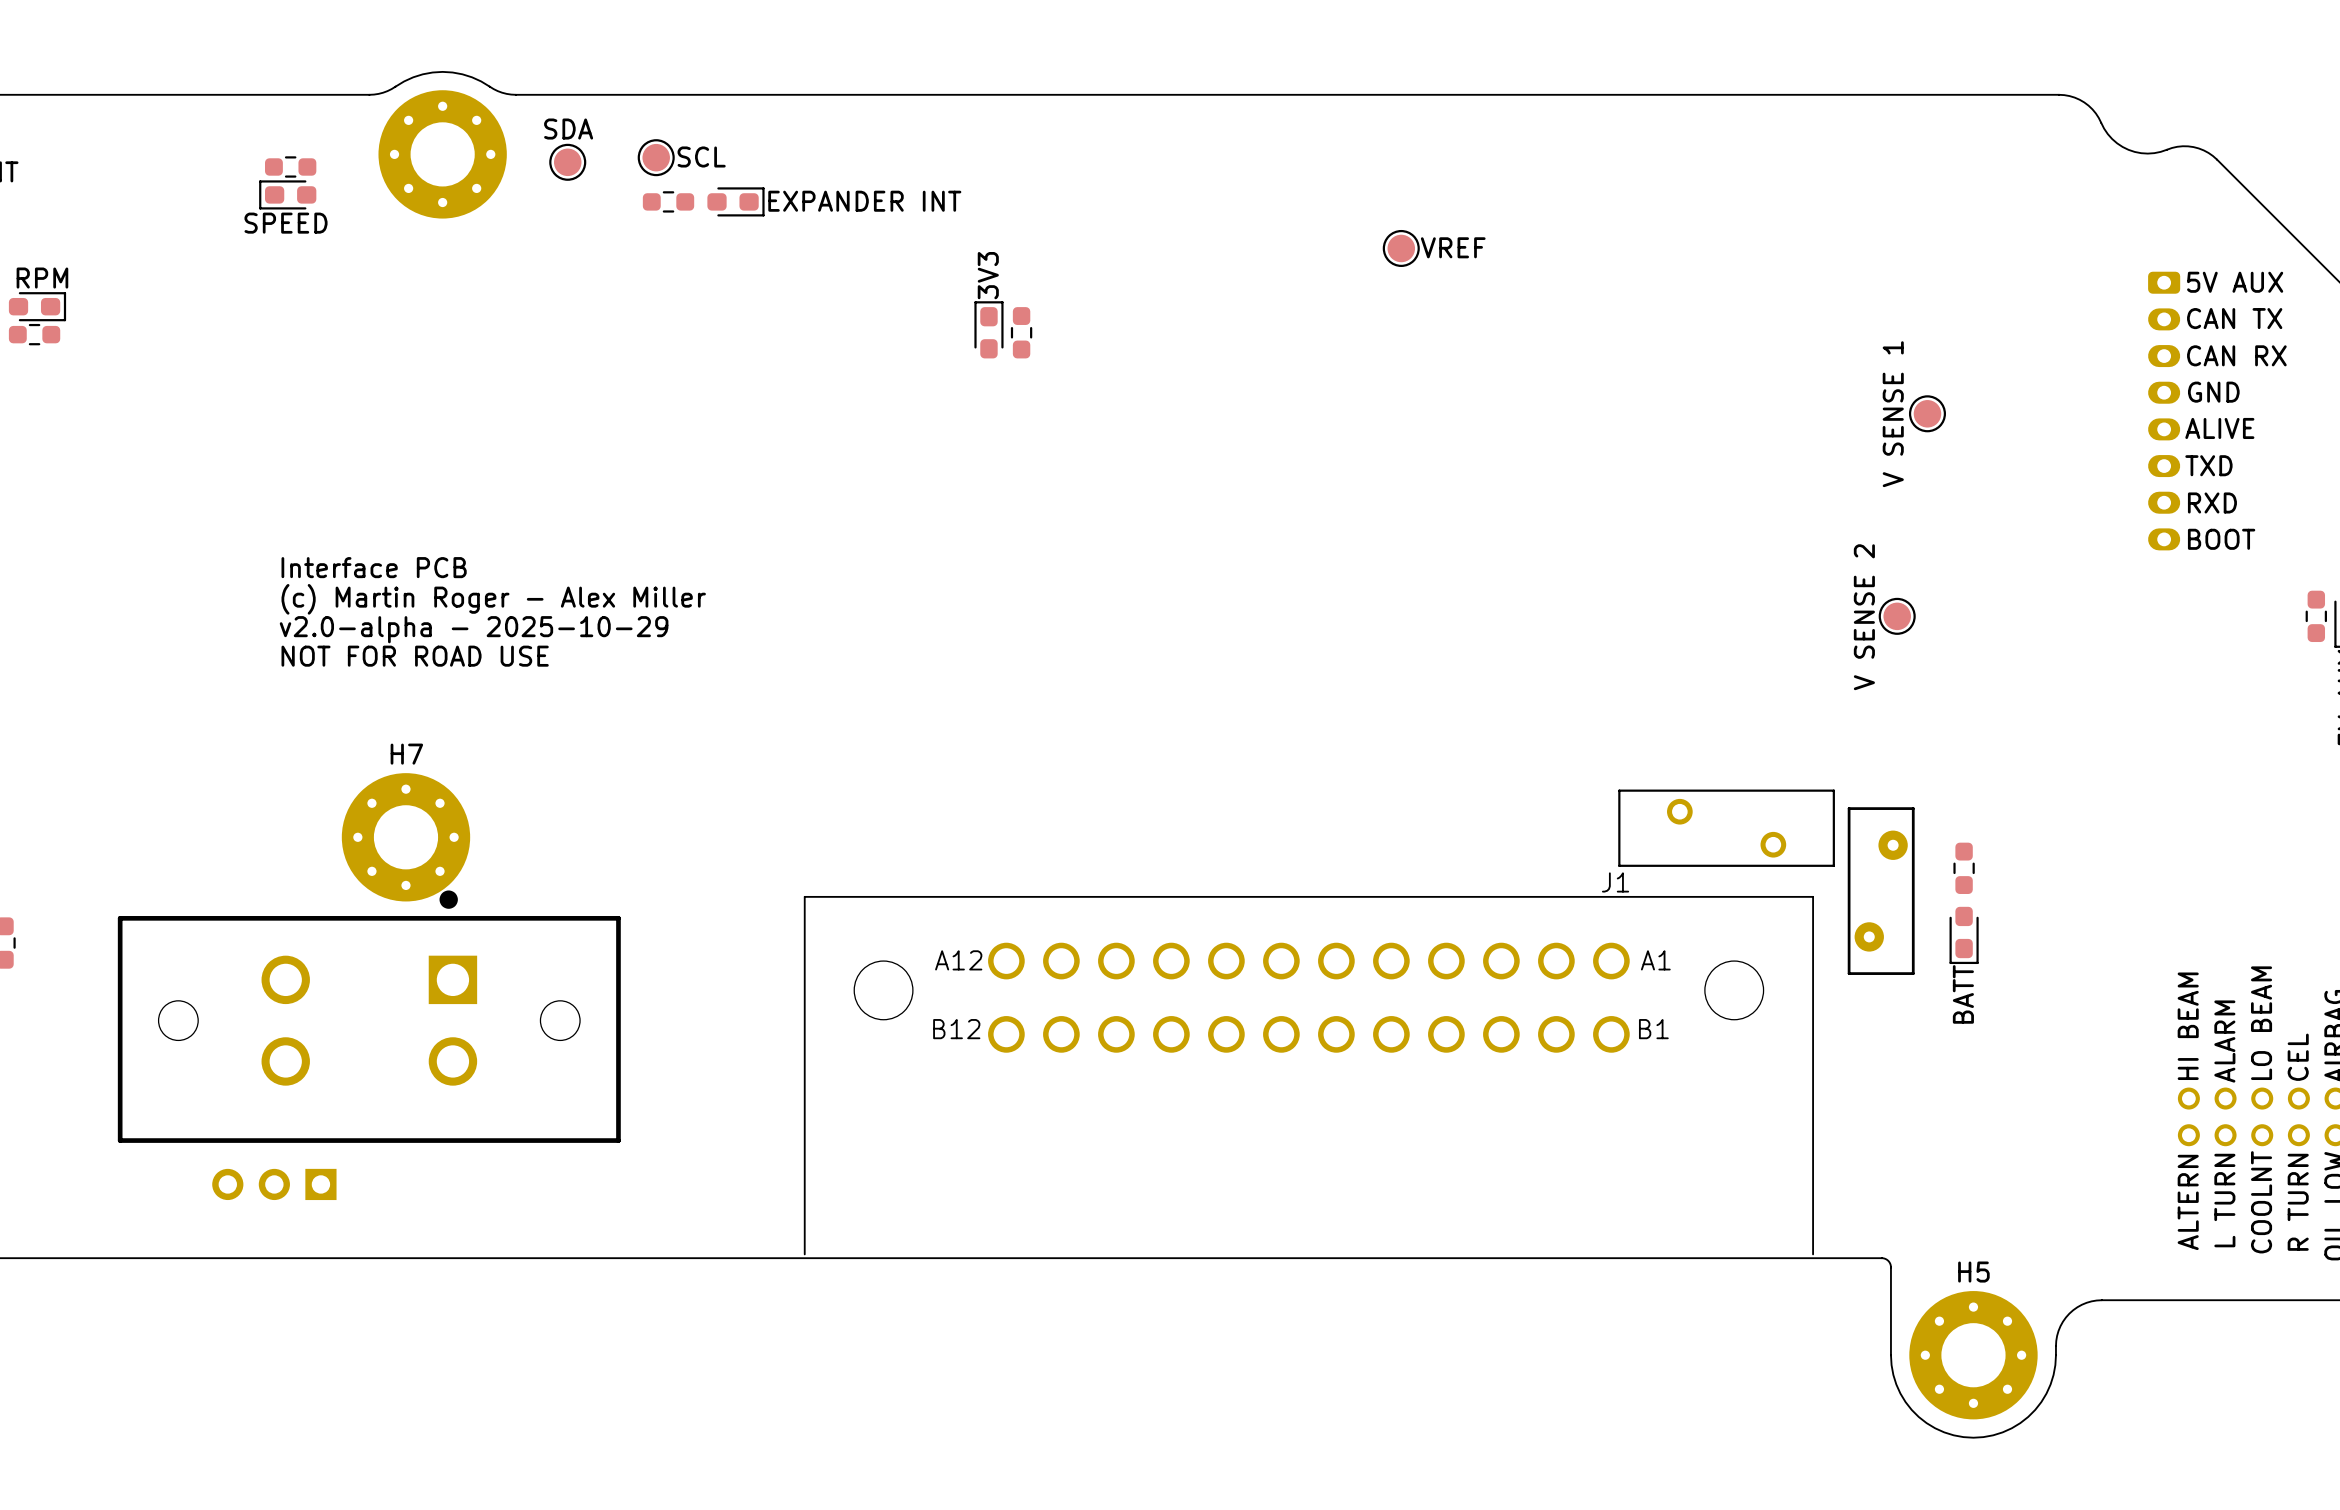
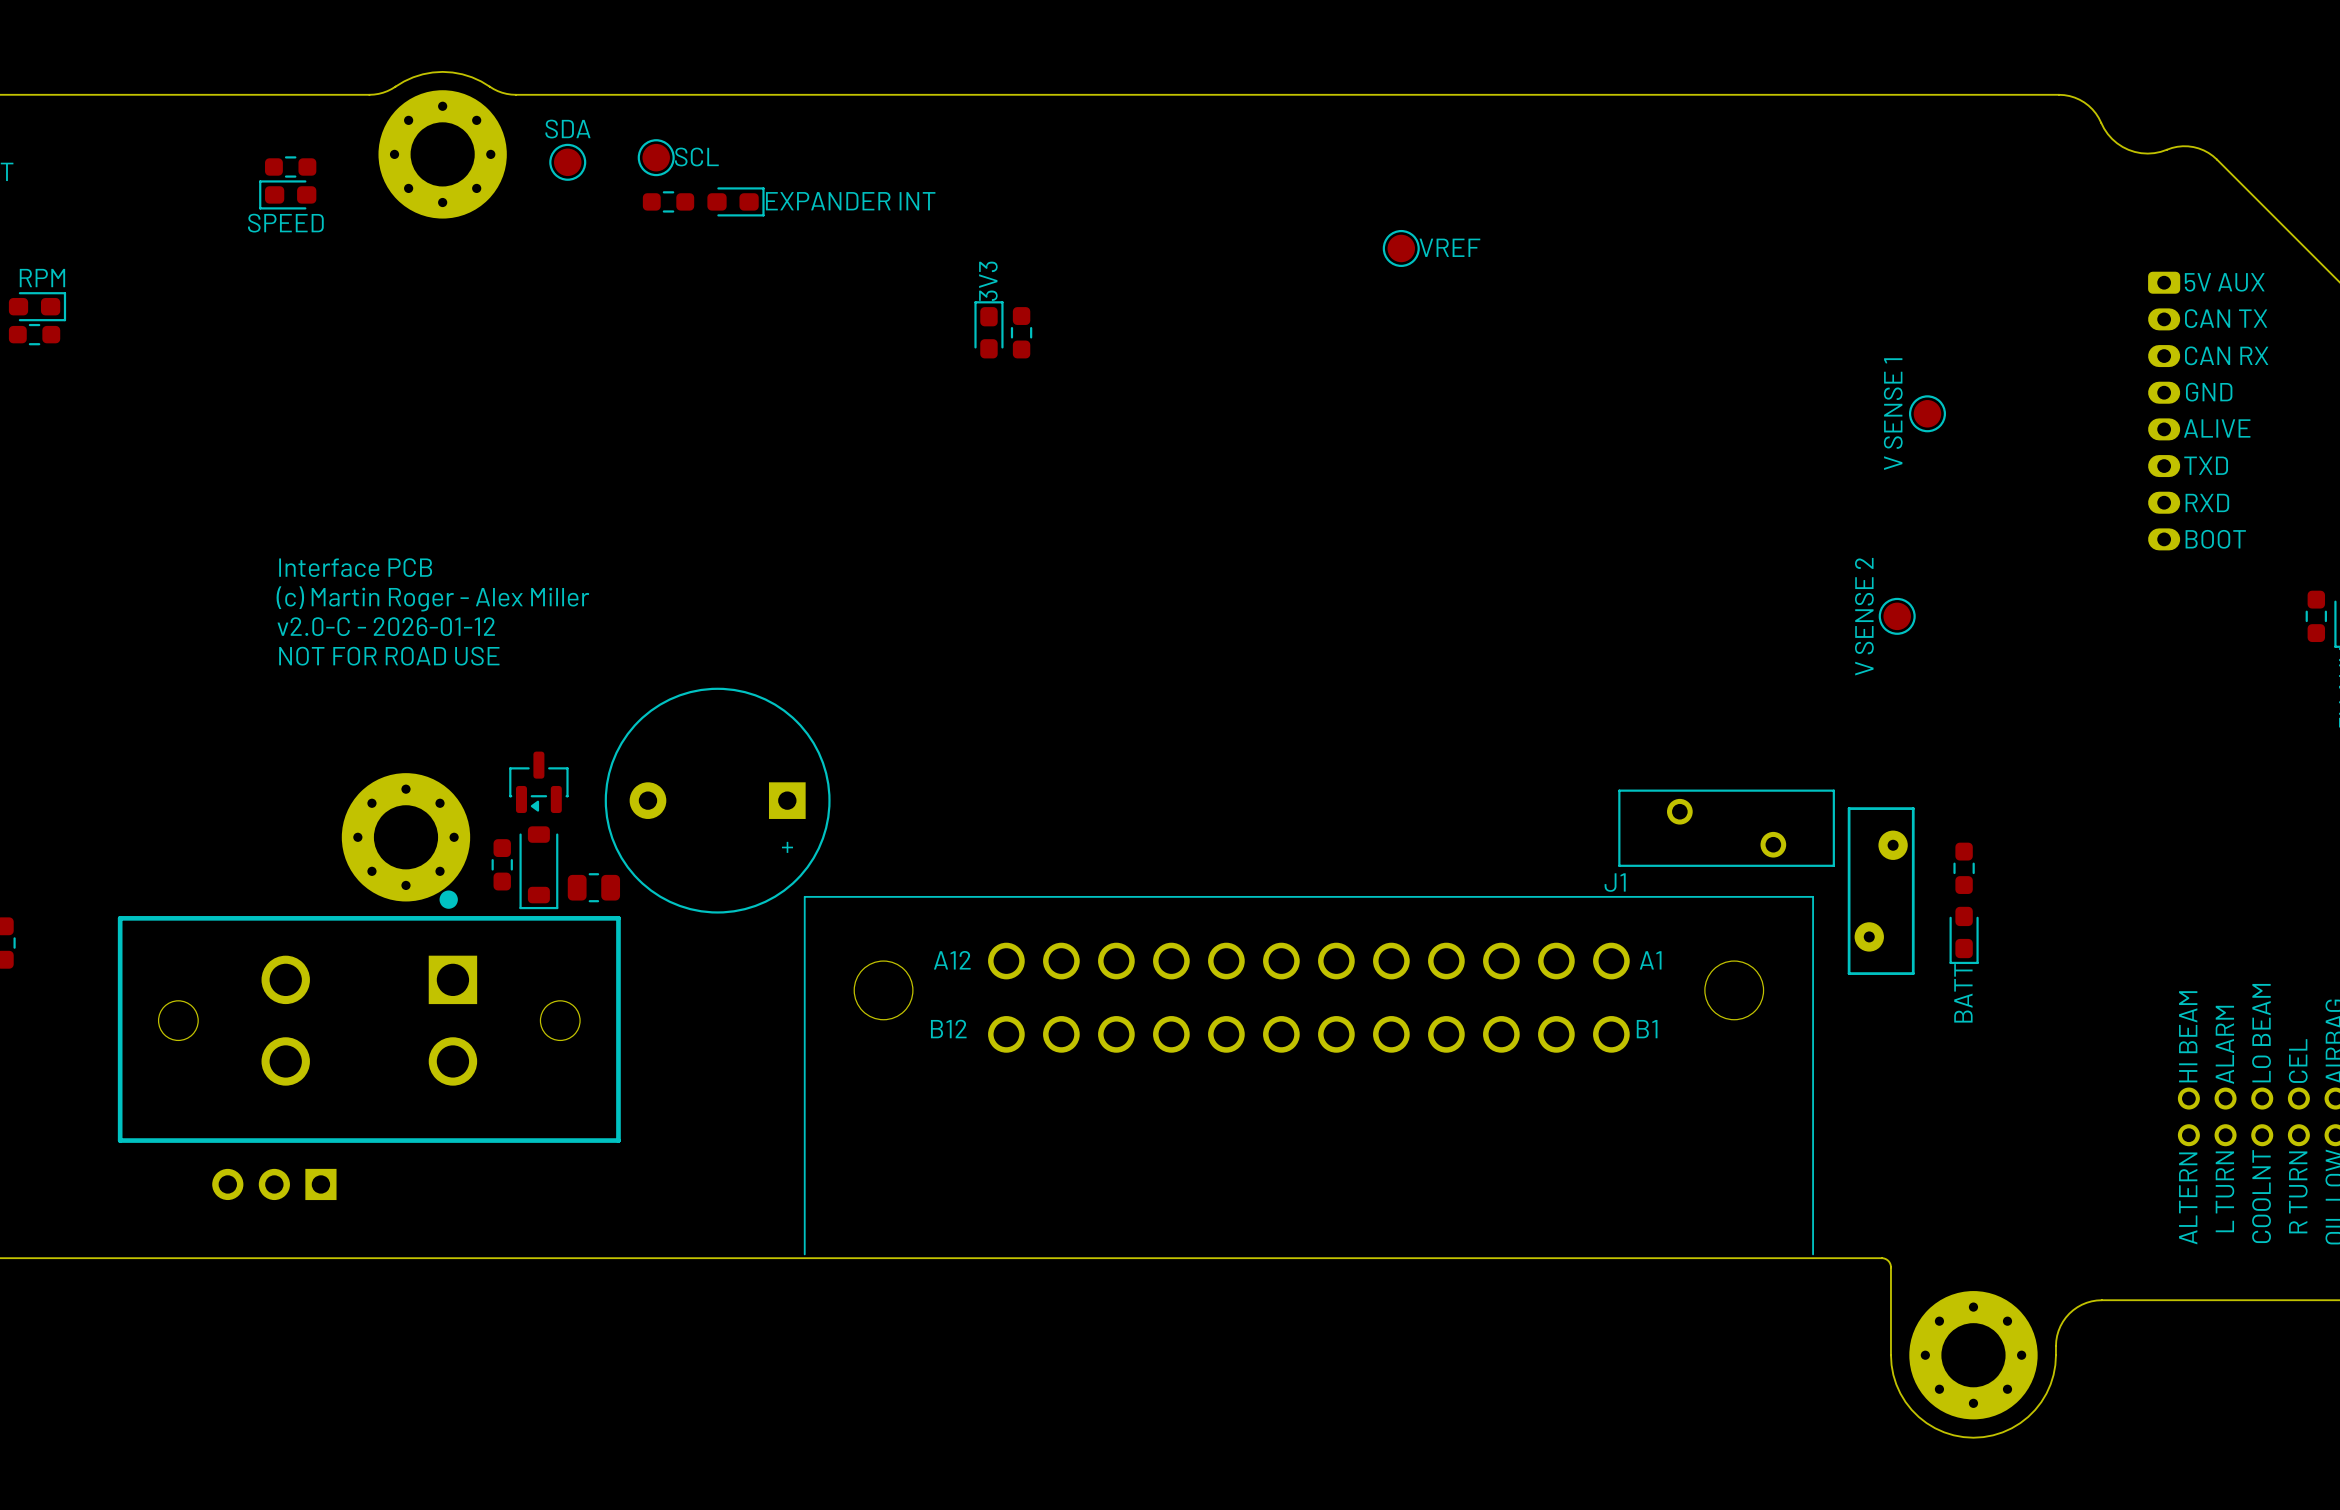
text: v2.0-alpha - 2025-10-29 (474, 629) -> v2.0-C - 2026-01-12 (386, 626)
H7 name: H7 (406, 754) -> none
part: none -> (538, 782)
part: none -> (717, 800)
part: none -> (502, 864)
part: none -> (538, 867)
part: none -> (593, 887)
H5 name: H5 (1973, 1272) -> none

